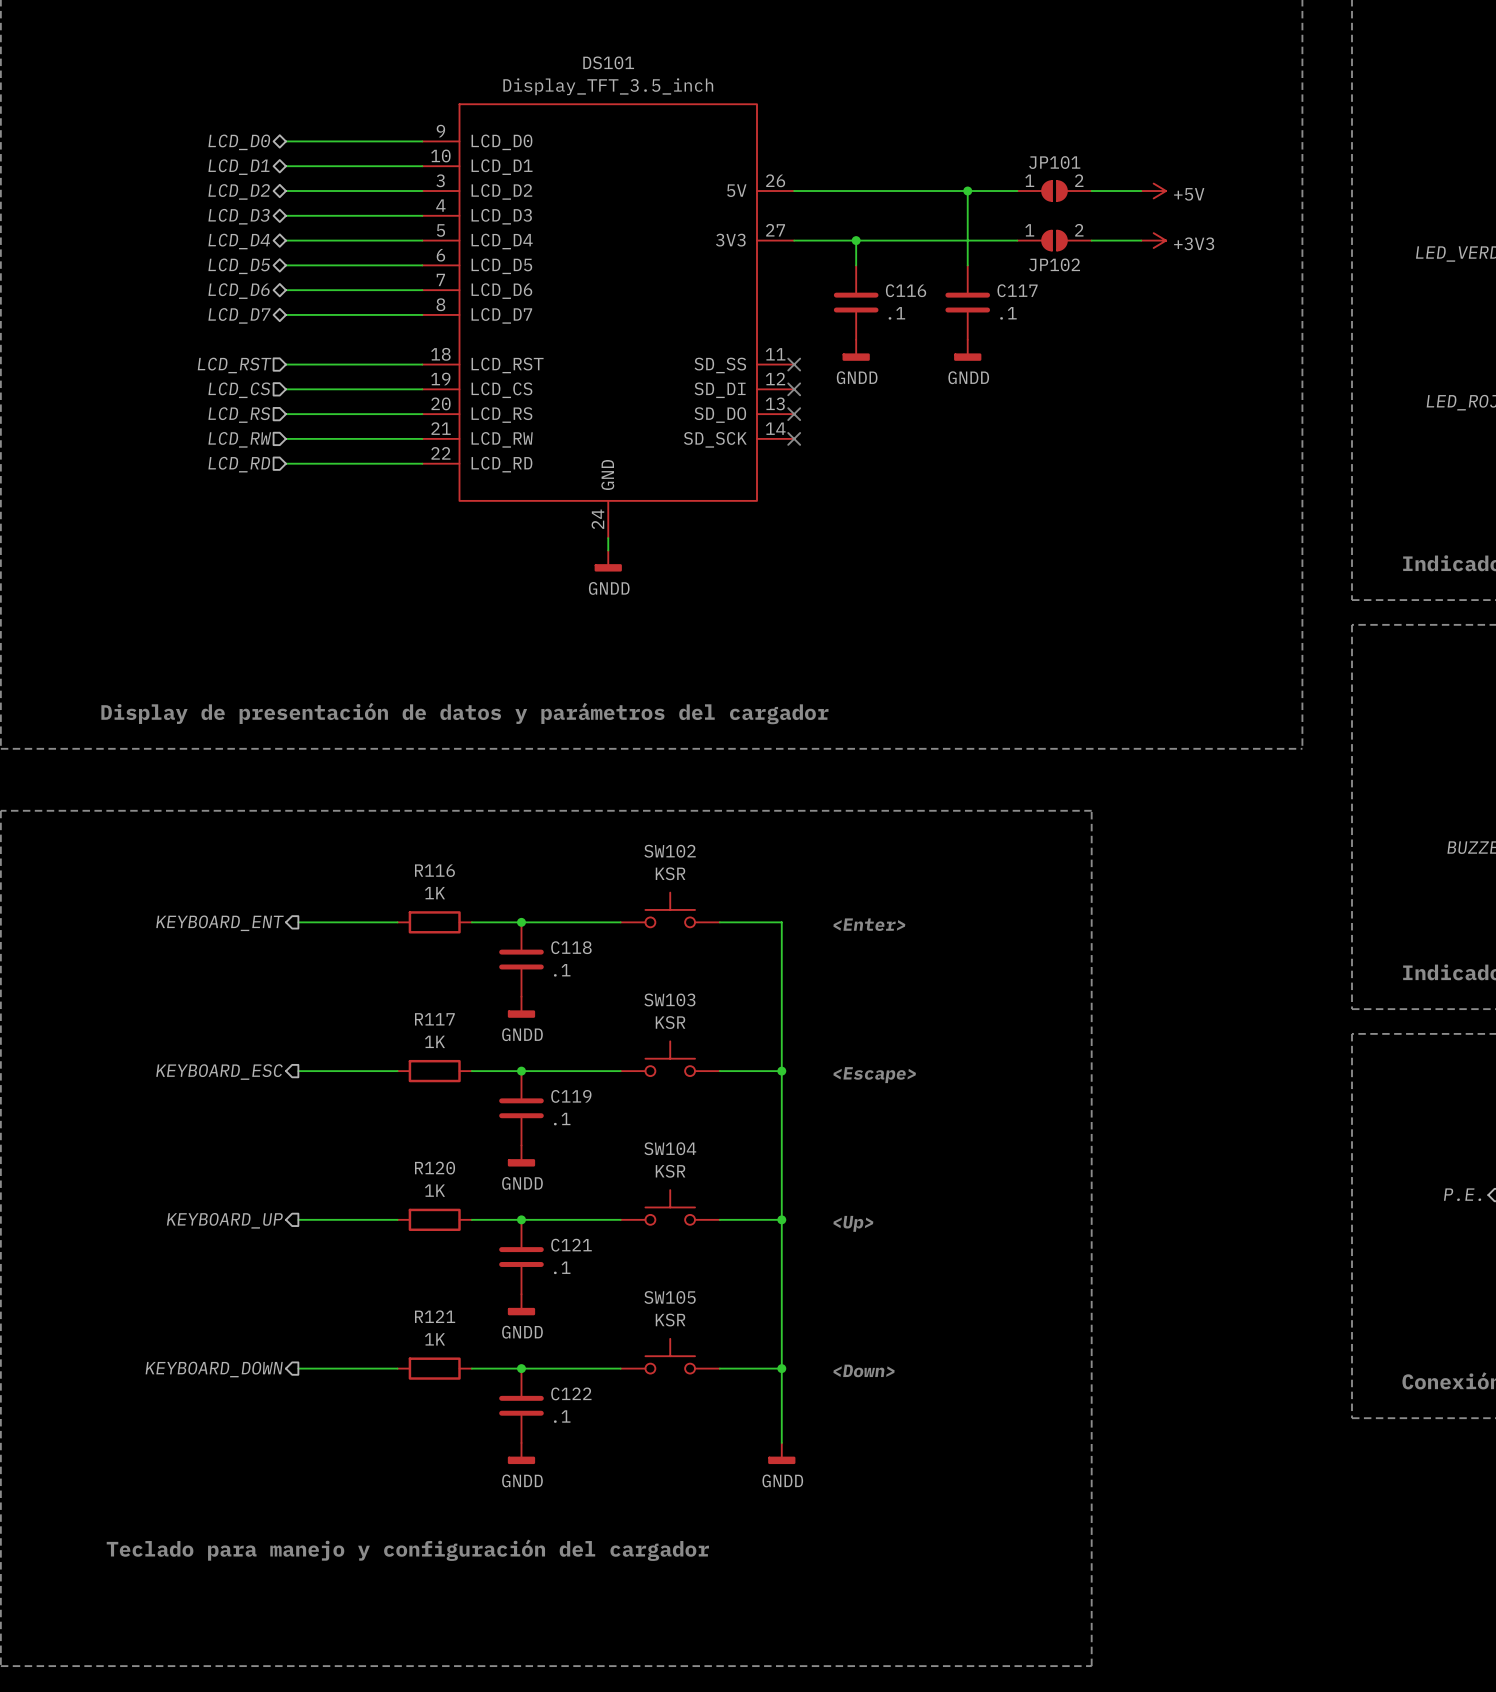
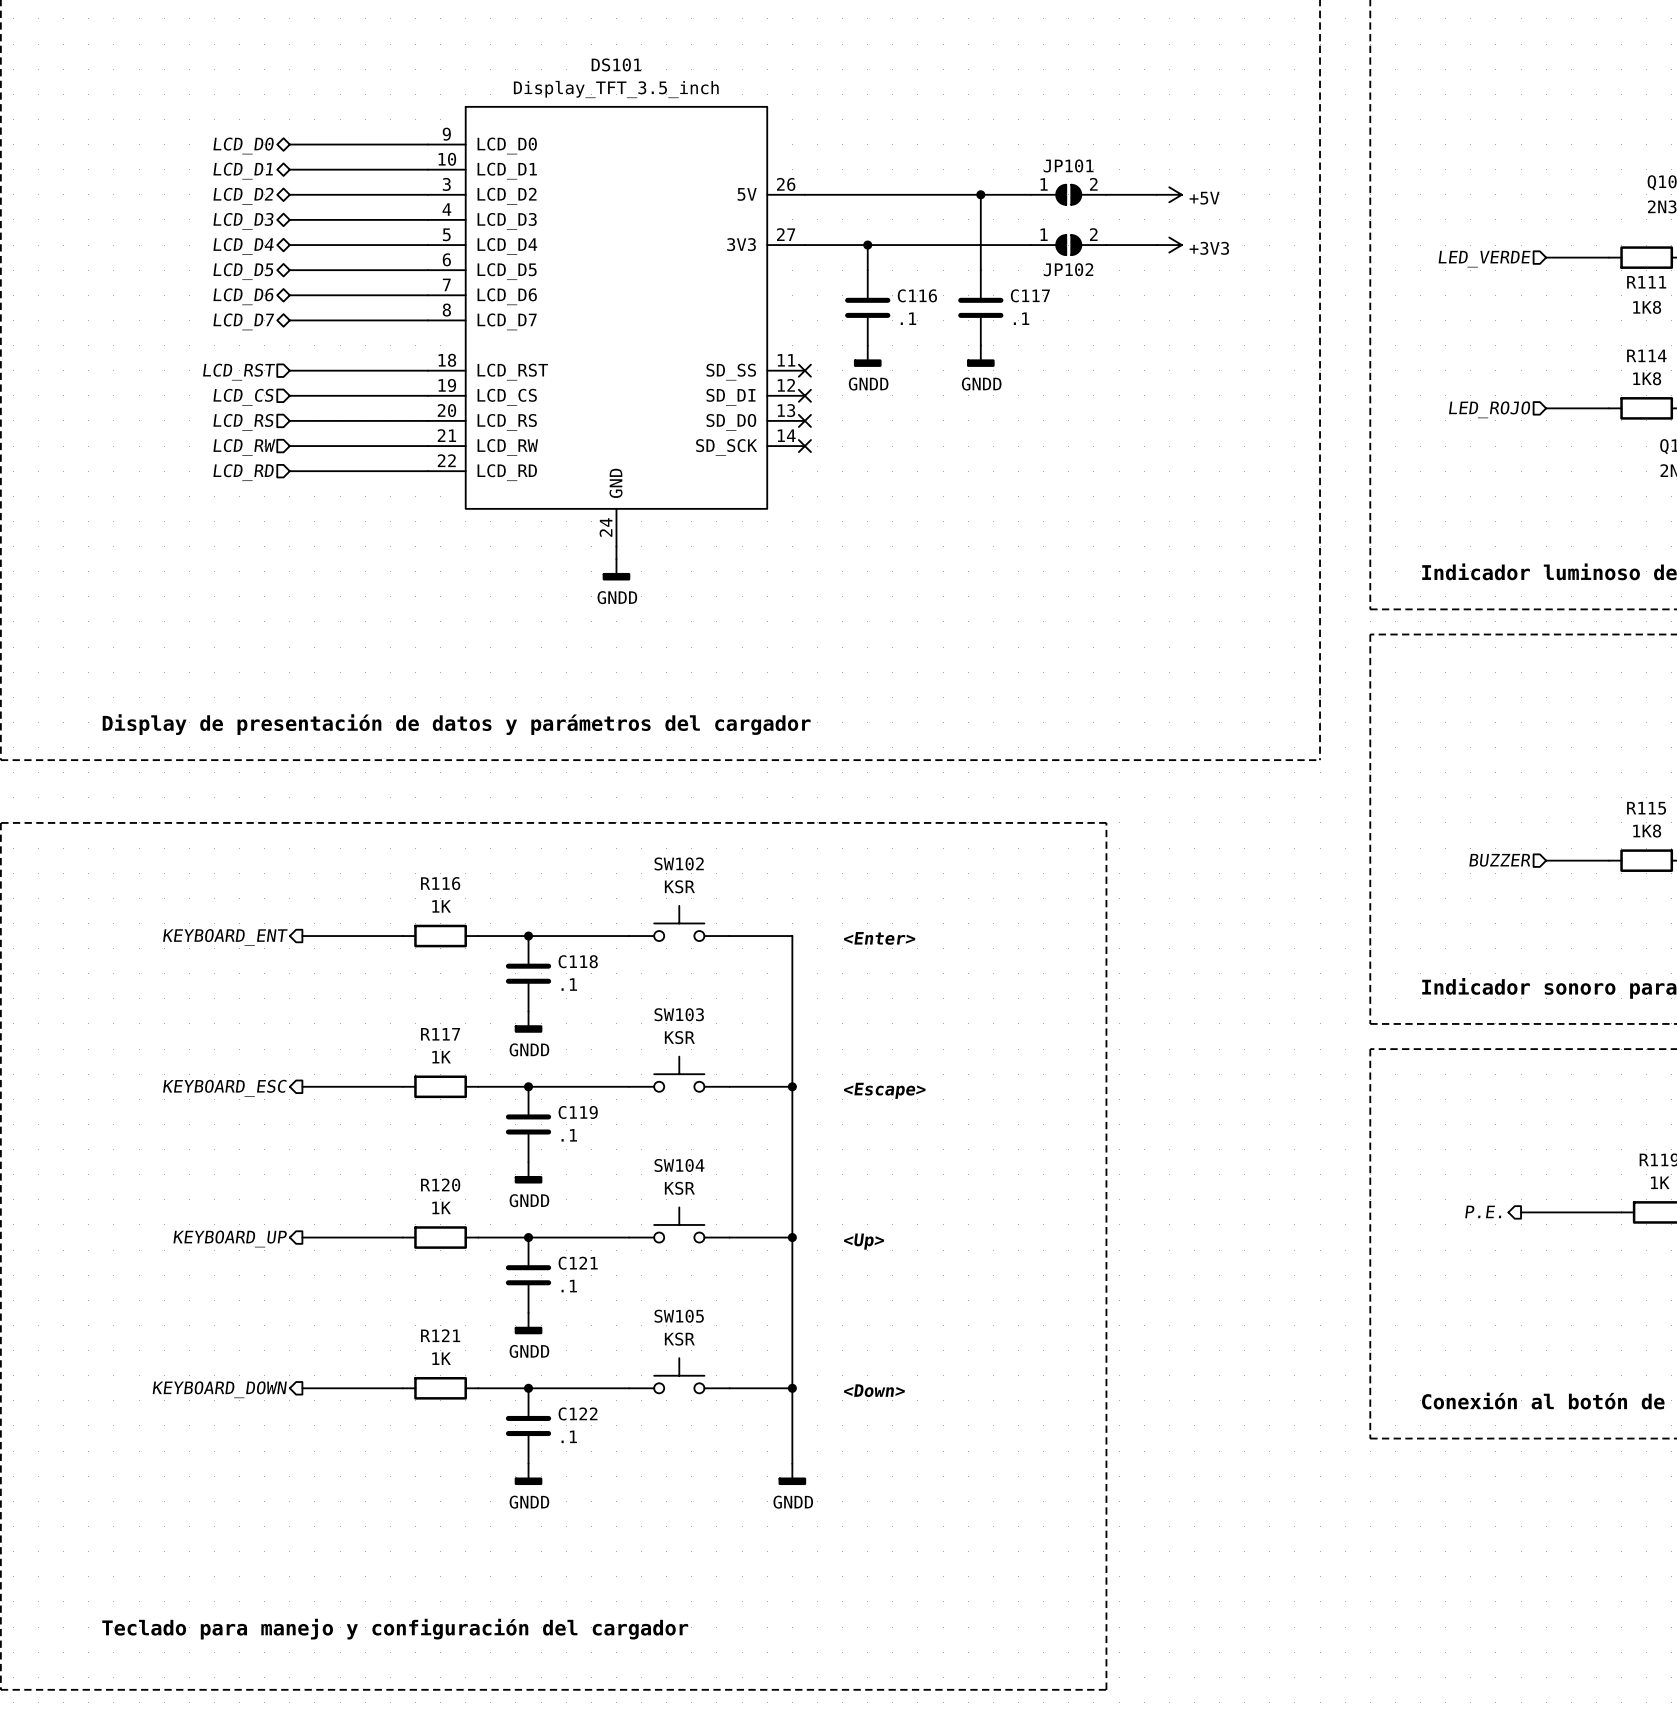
text position: Teclado para manejo y configuración del cargador (407, 1550) -> Teclado para manejo y configuración del cargador (395, 1629)

